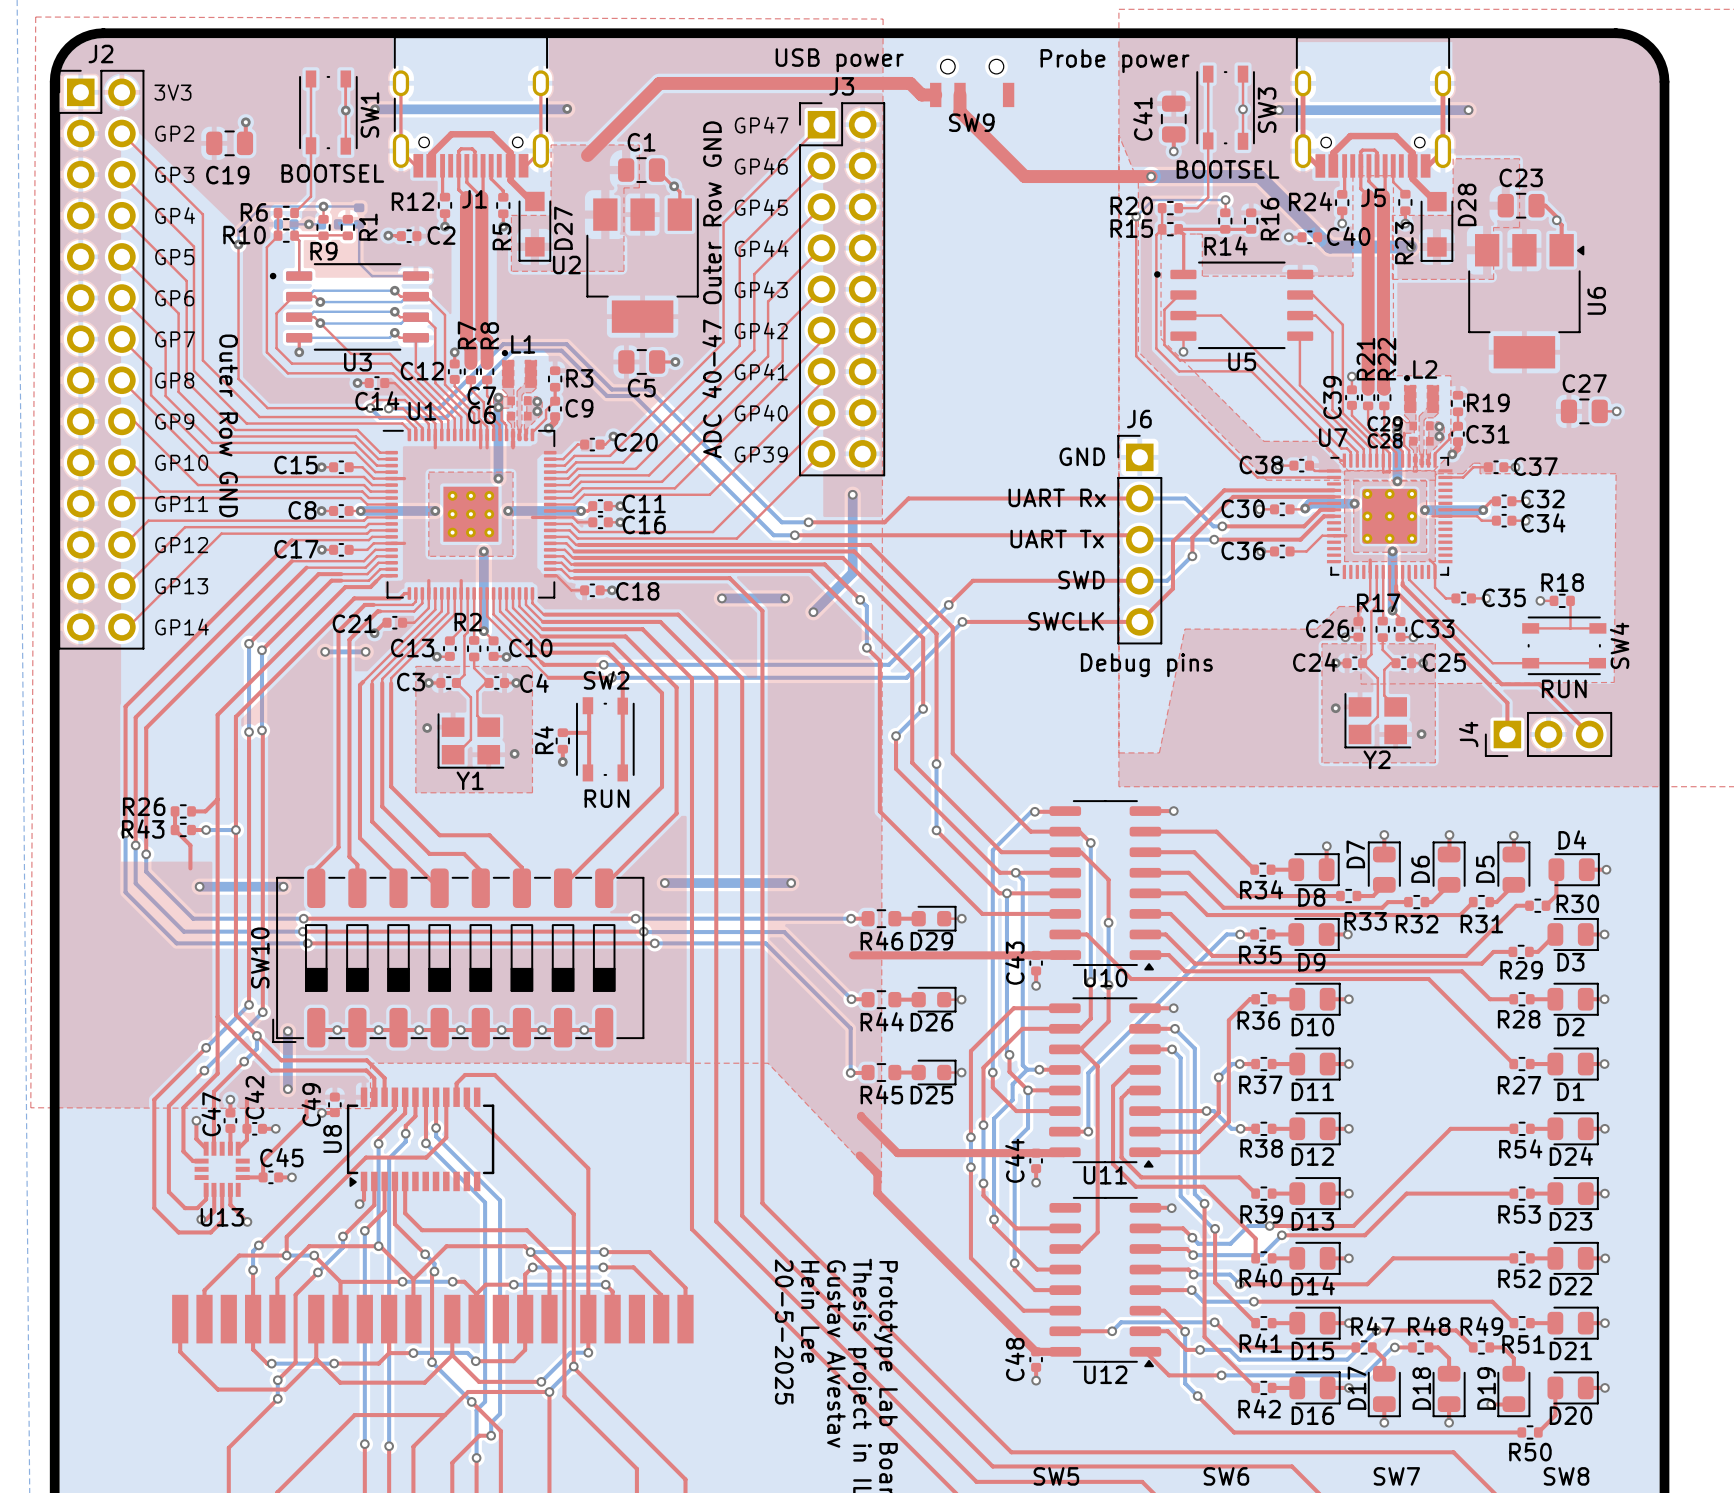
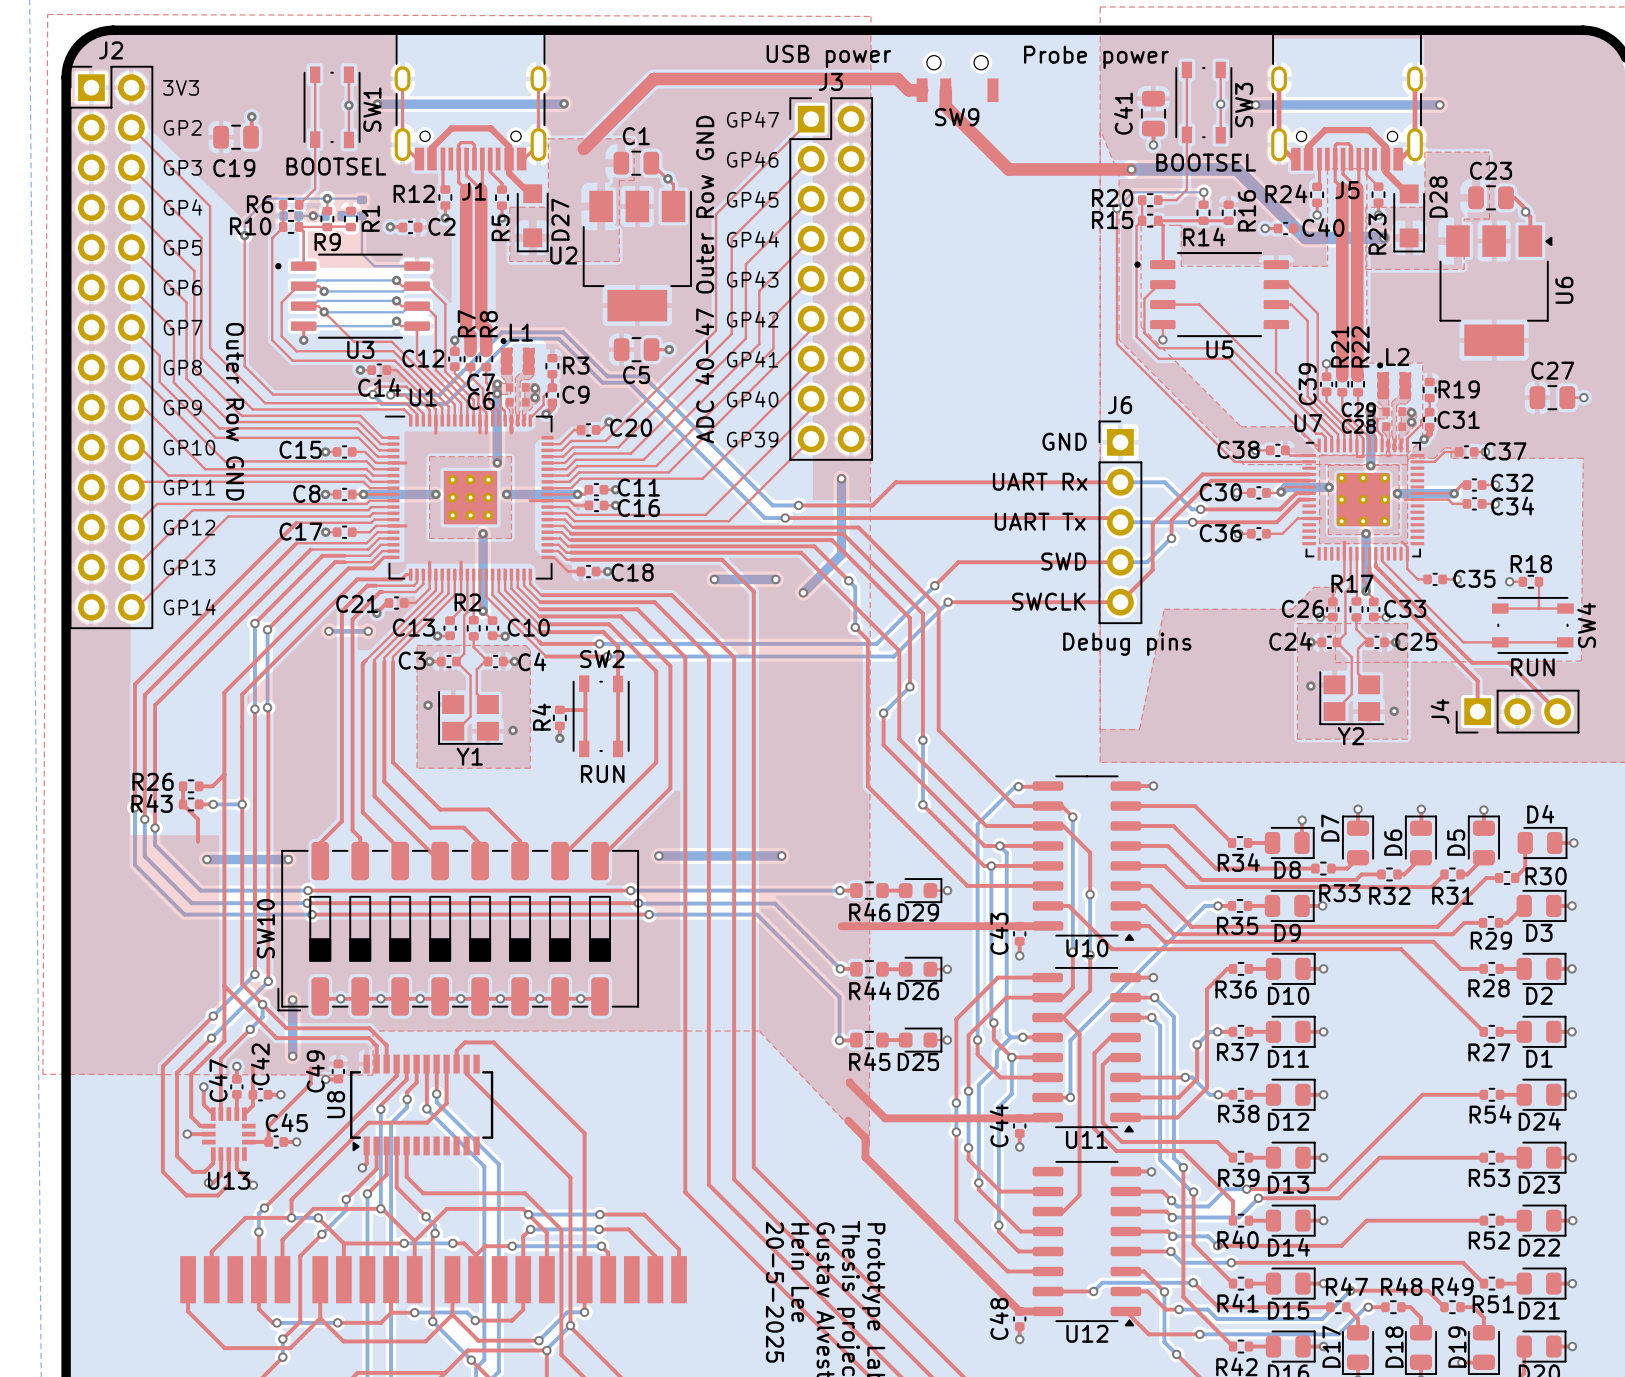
top track: none -> (187, 1134) (208, 1134)
via: none -> (187, 1134)

